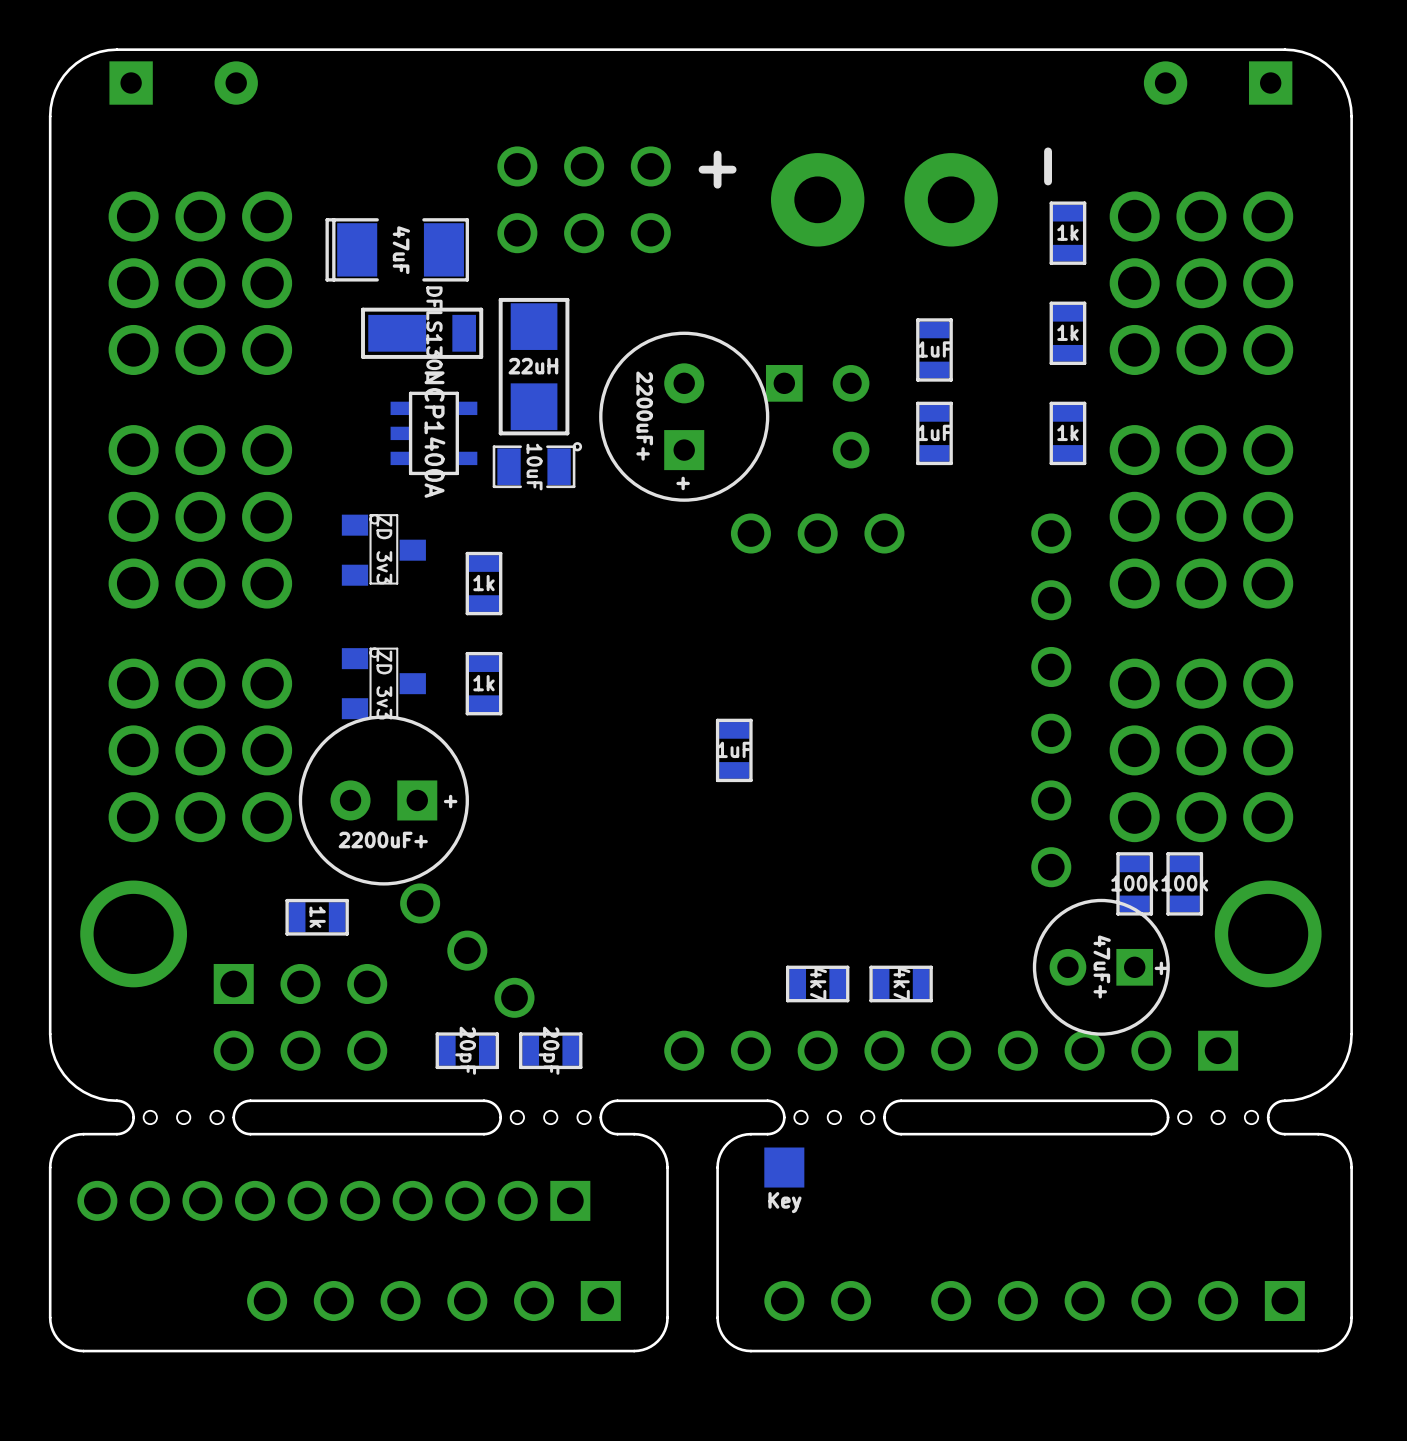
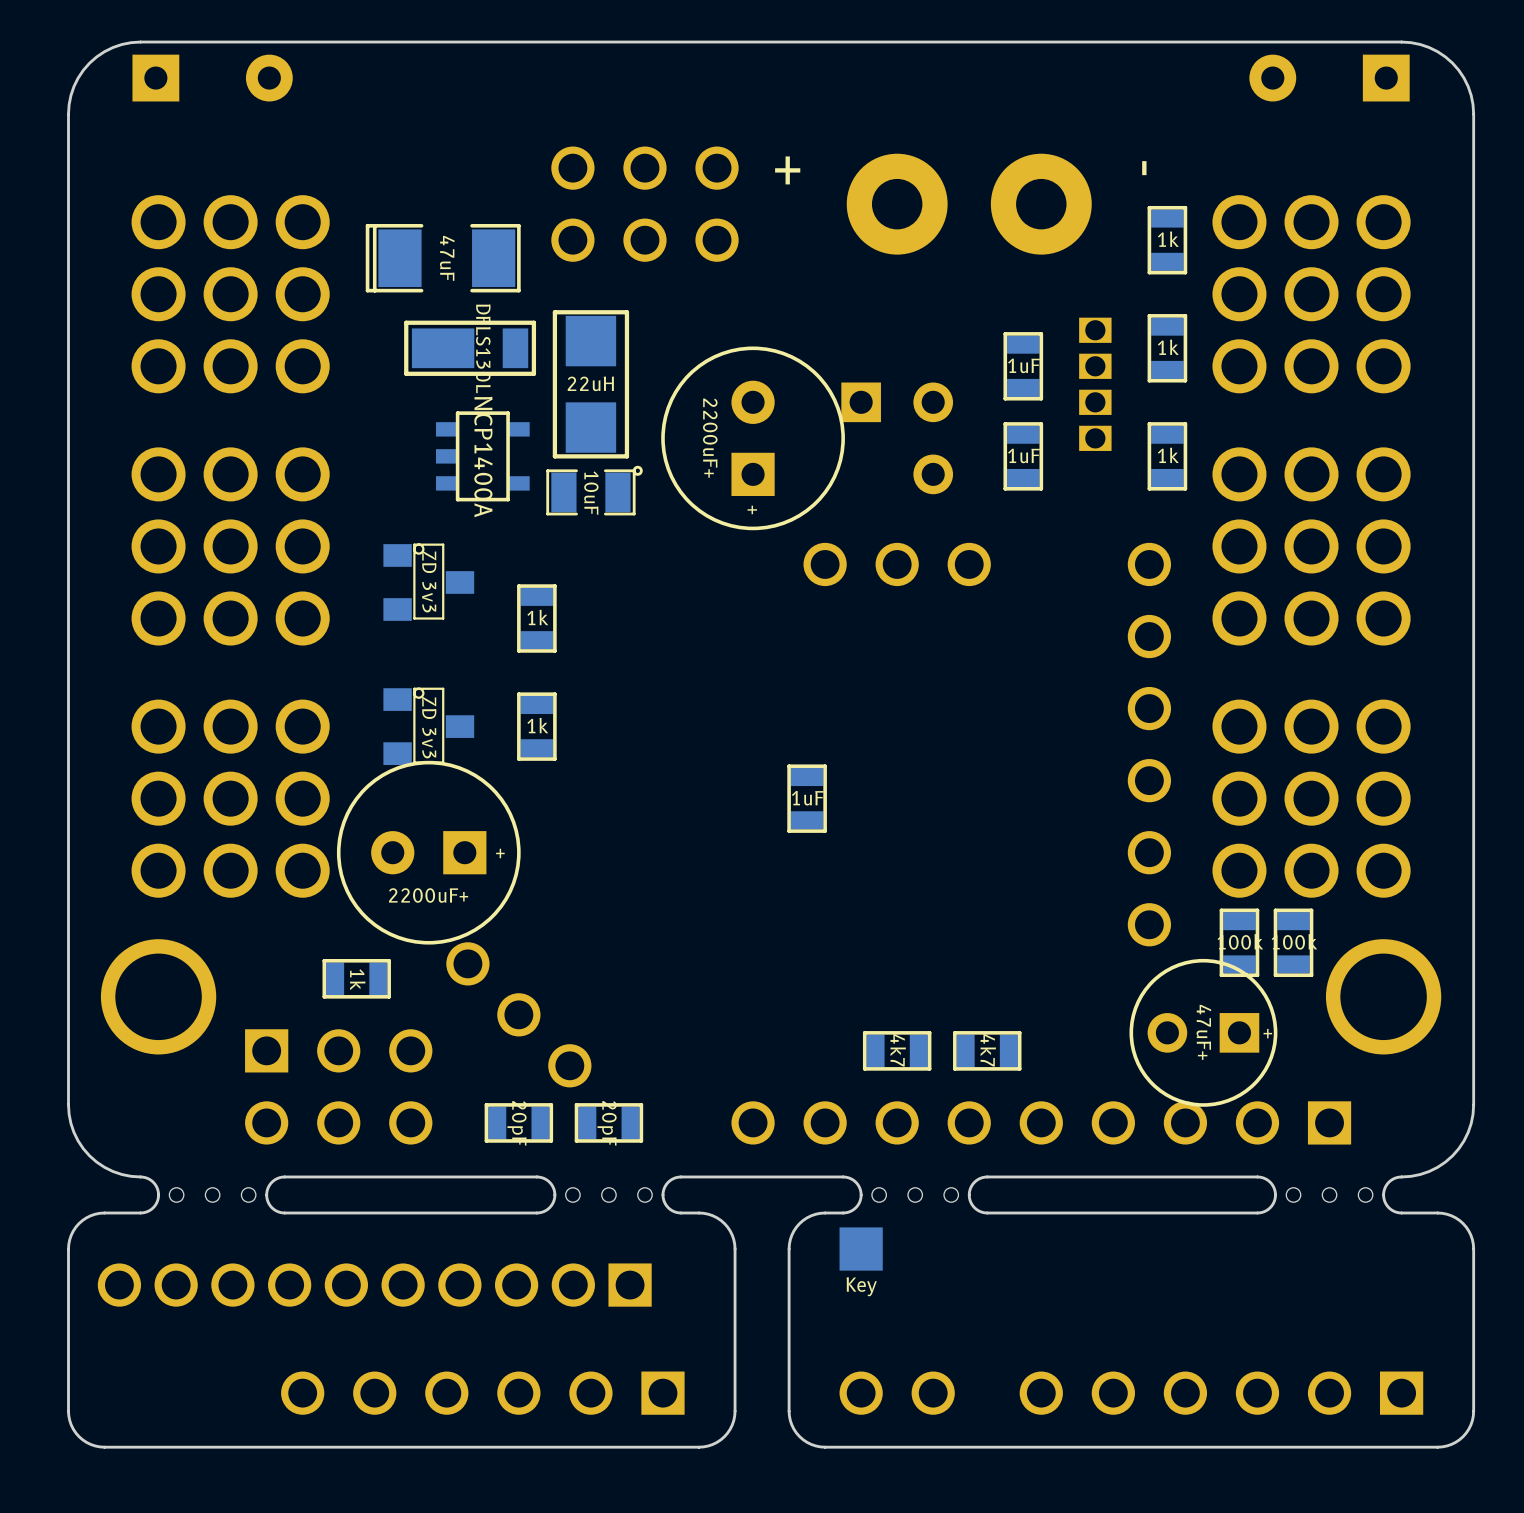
part: none -> (1095, 384)

